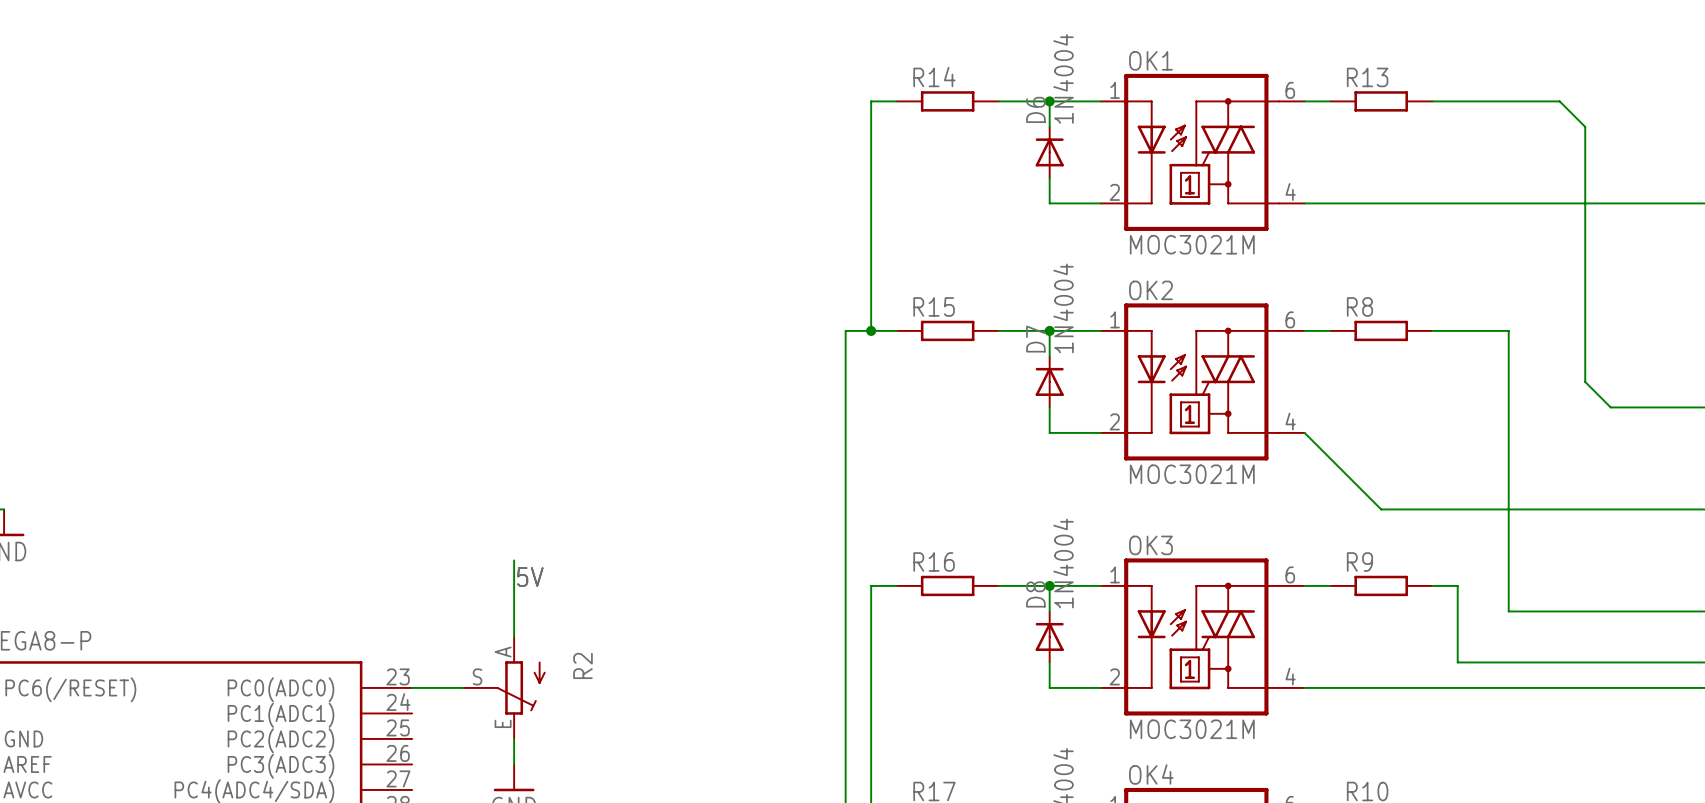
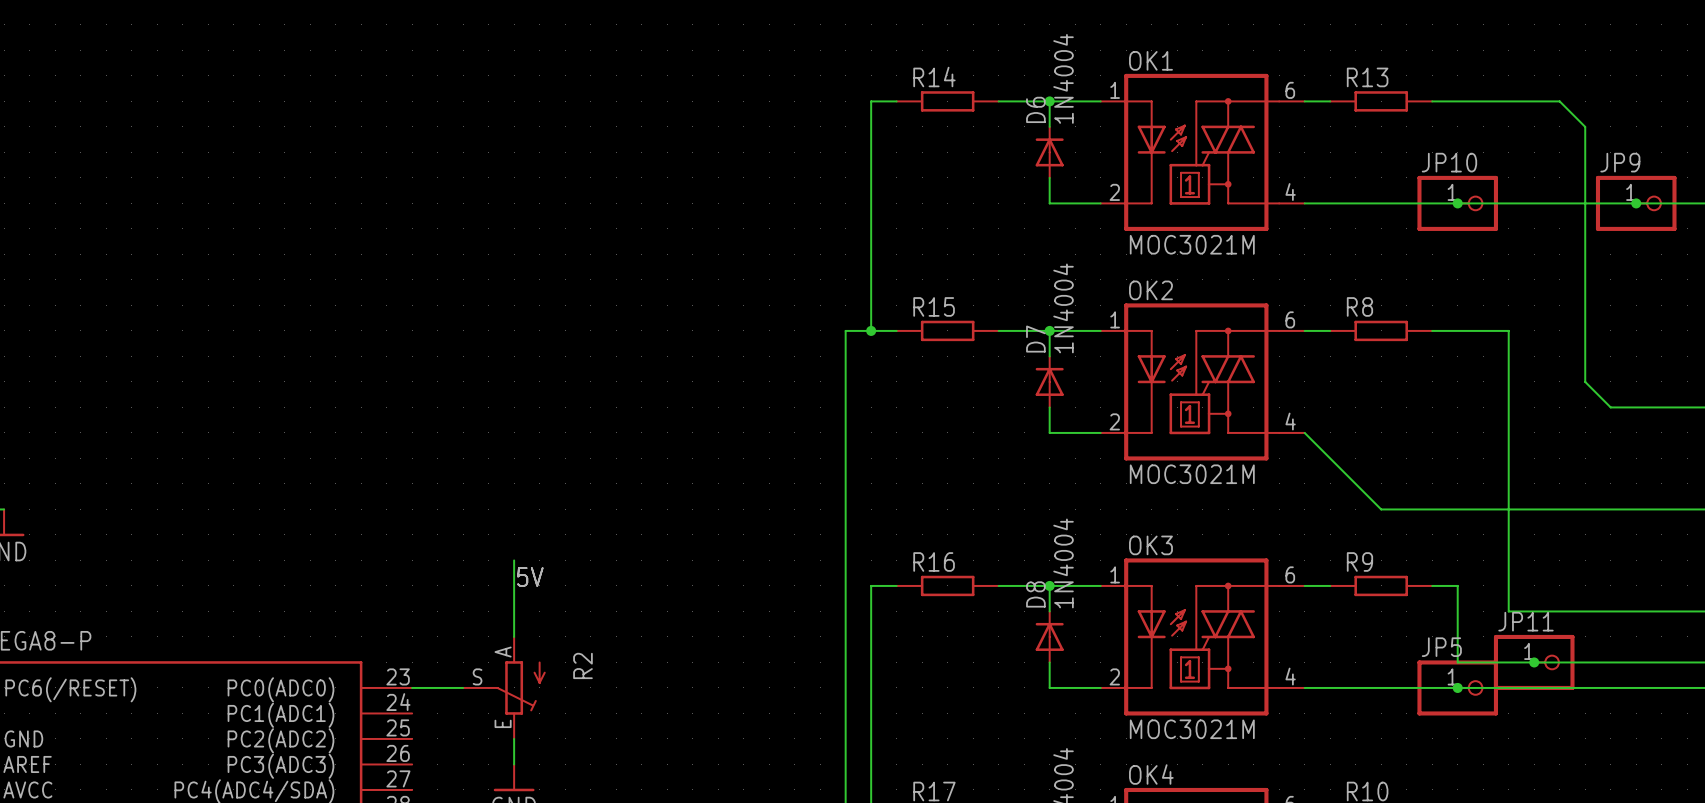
JP10: none -> (1457, 203)
junction: none -> (1457, 203)
JP9: none -> (1636, 203)
junction: none -> (1636, 203)
JP11: none -> (1534, 662)
junction: none -> (1534, 662)
JP5: none -> (1457, 687)
junction: none -> (1457, 687)

